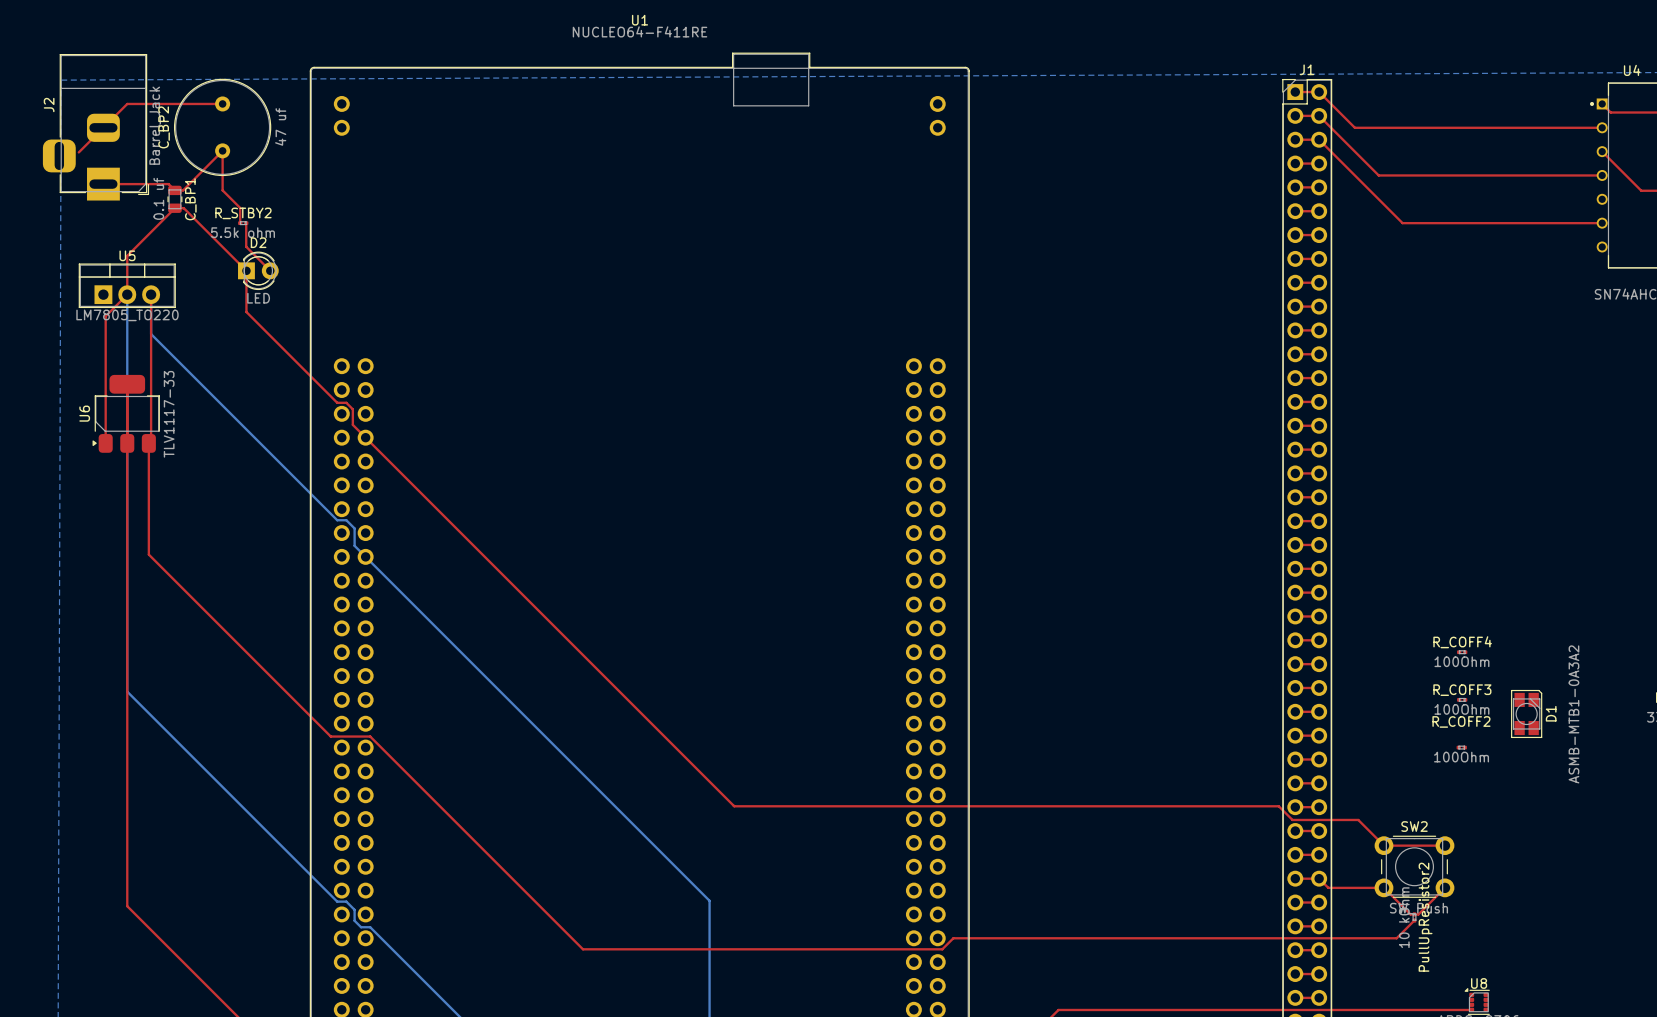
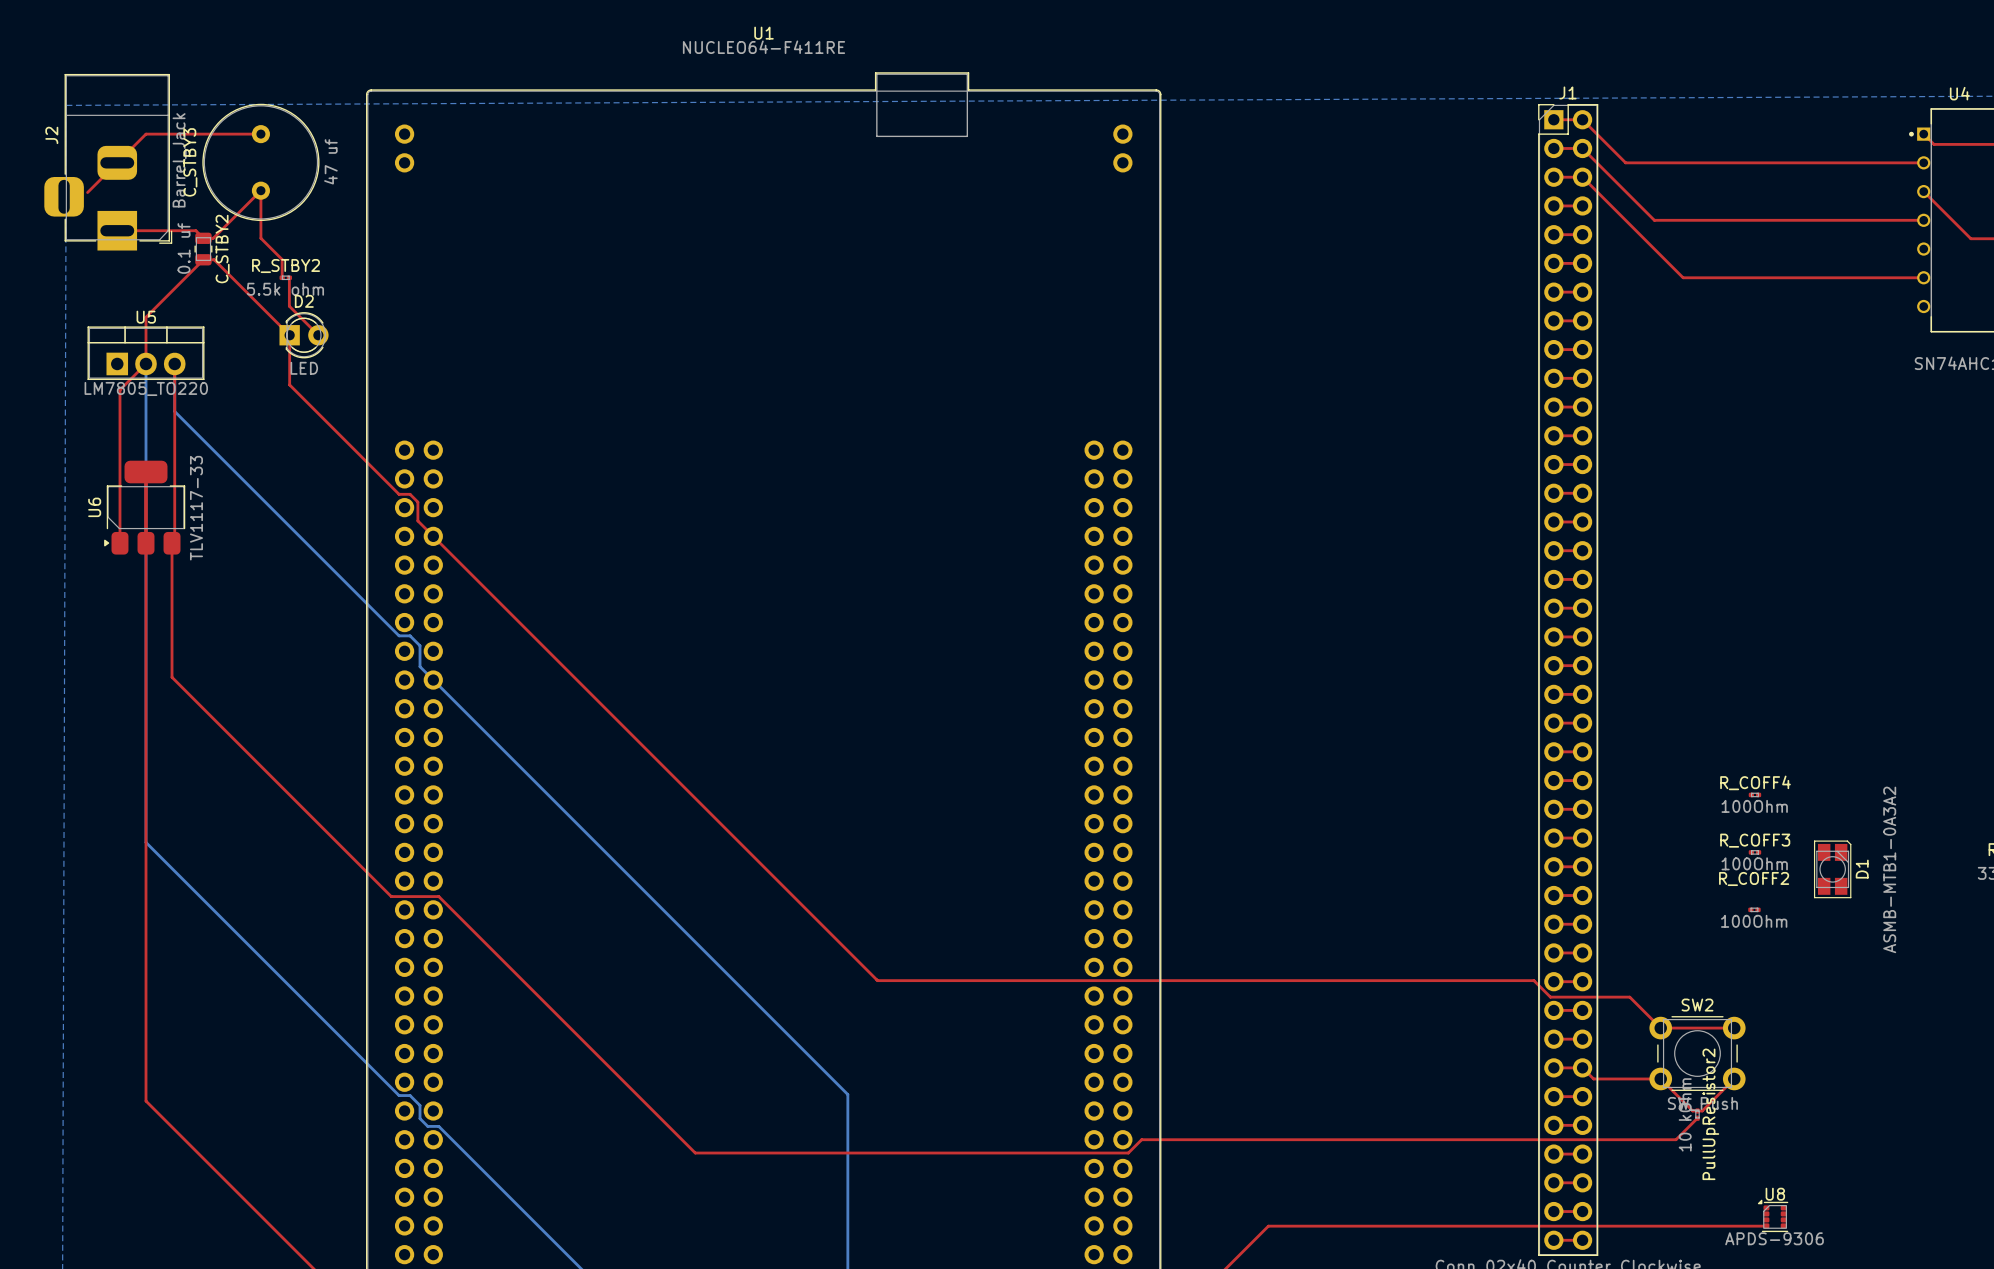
C_BP2 name: C_BP2 (164, 127) -> C_STBY3 (190, 162)
C_BP1 name: C_BP1 (190, 199) -> C_STBY2 (222, 249)

